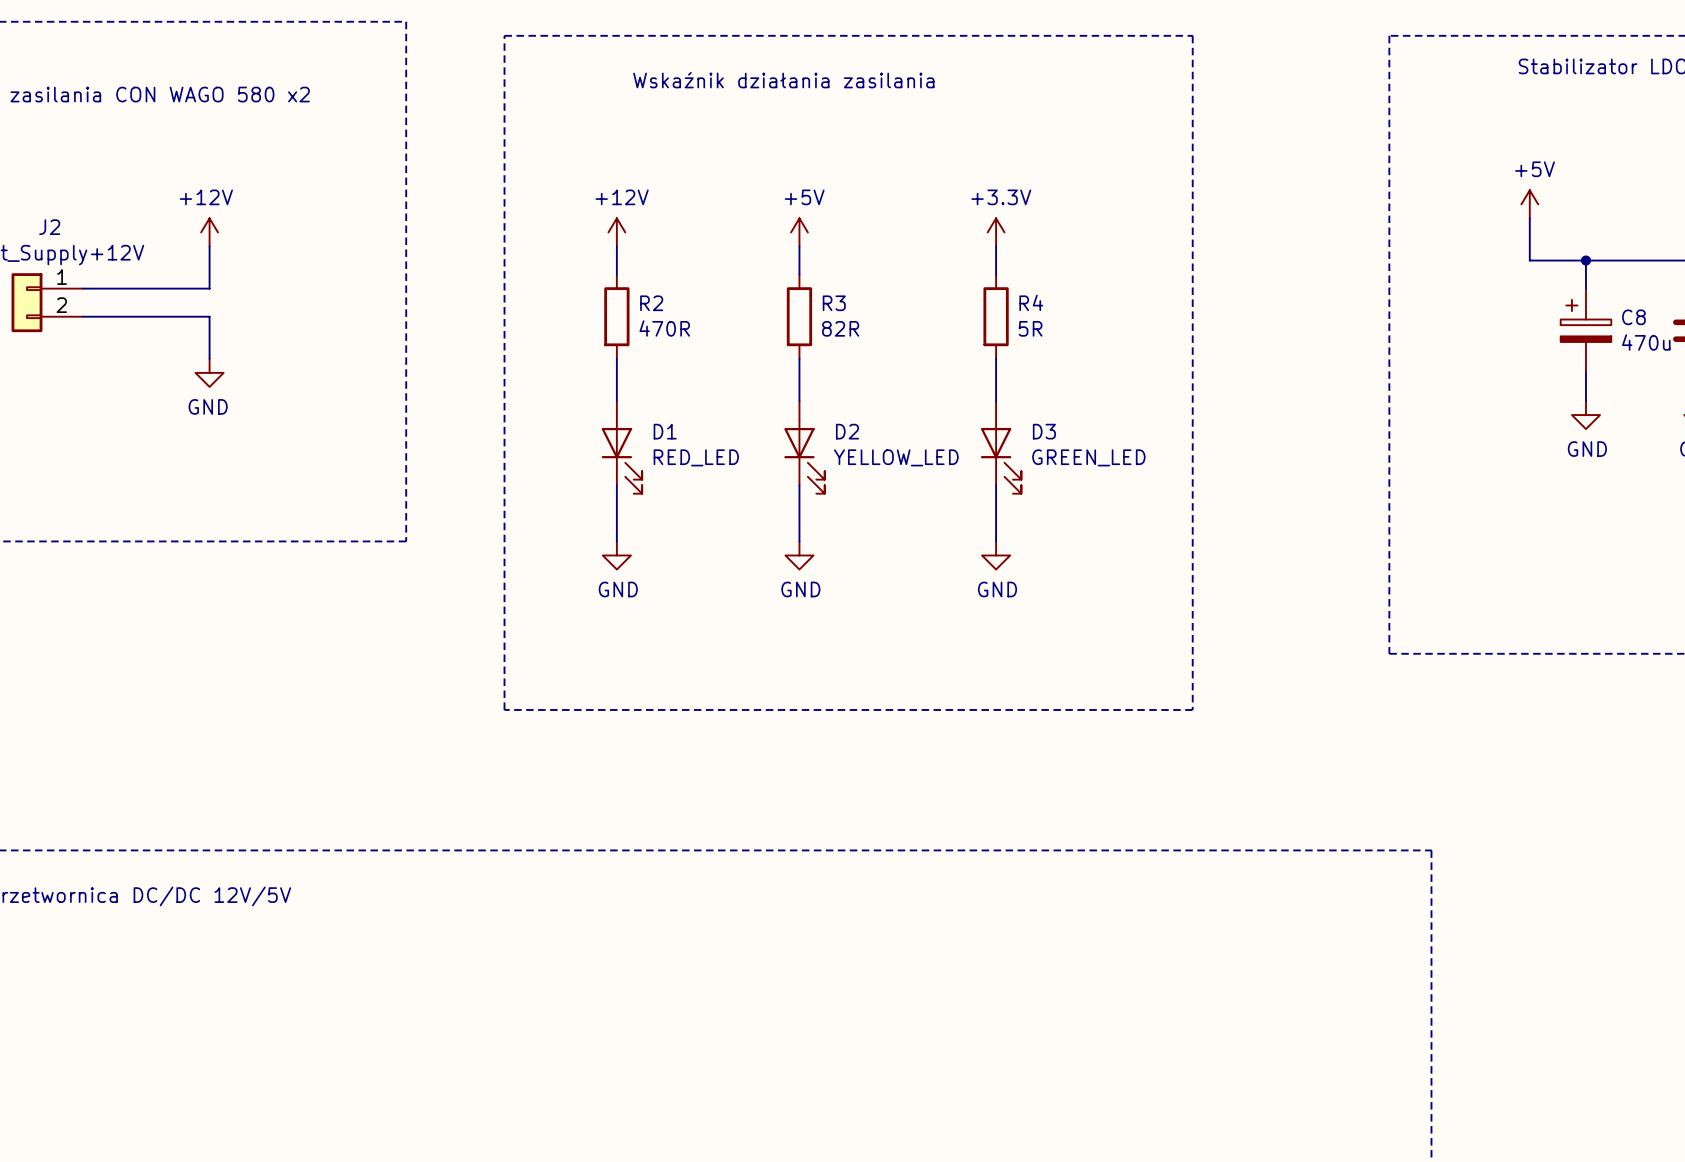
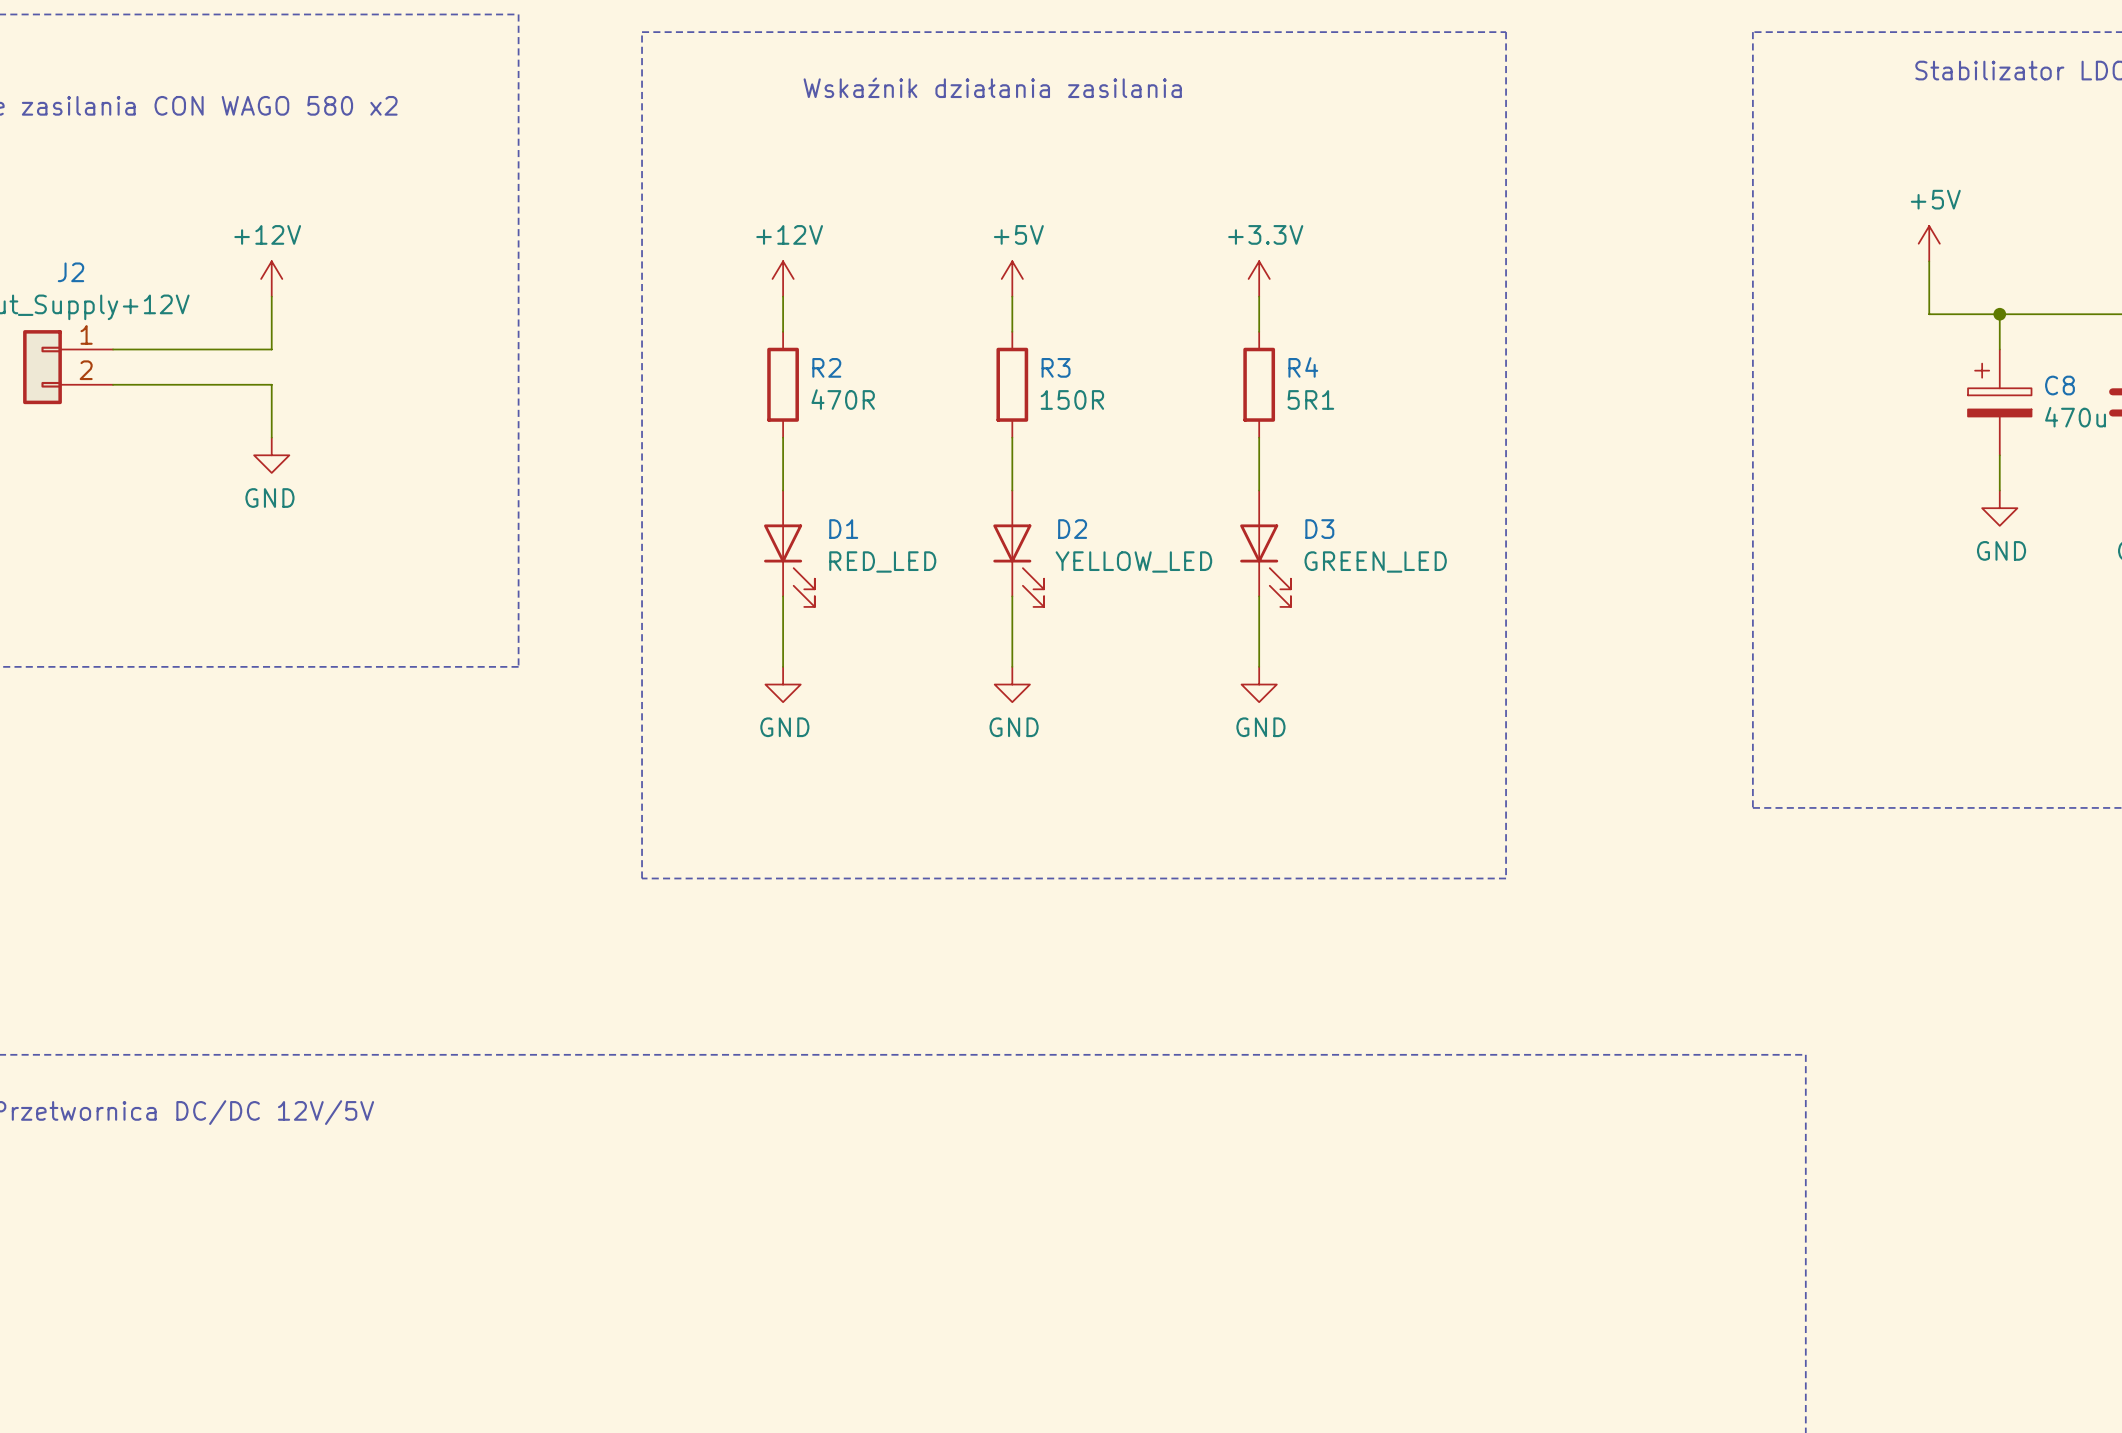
R3 value: 82R (840, 328) -> 150R (1072, 399)
R4 value: 5R (1030, 328) -> 5R1 (1310, 399)

